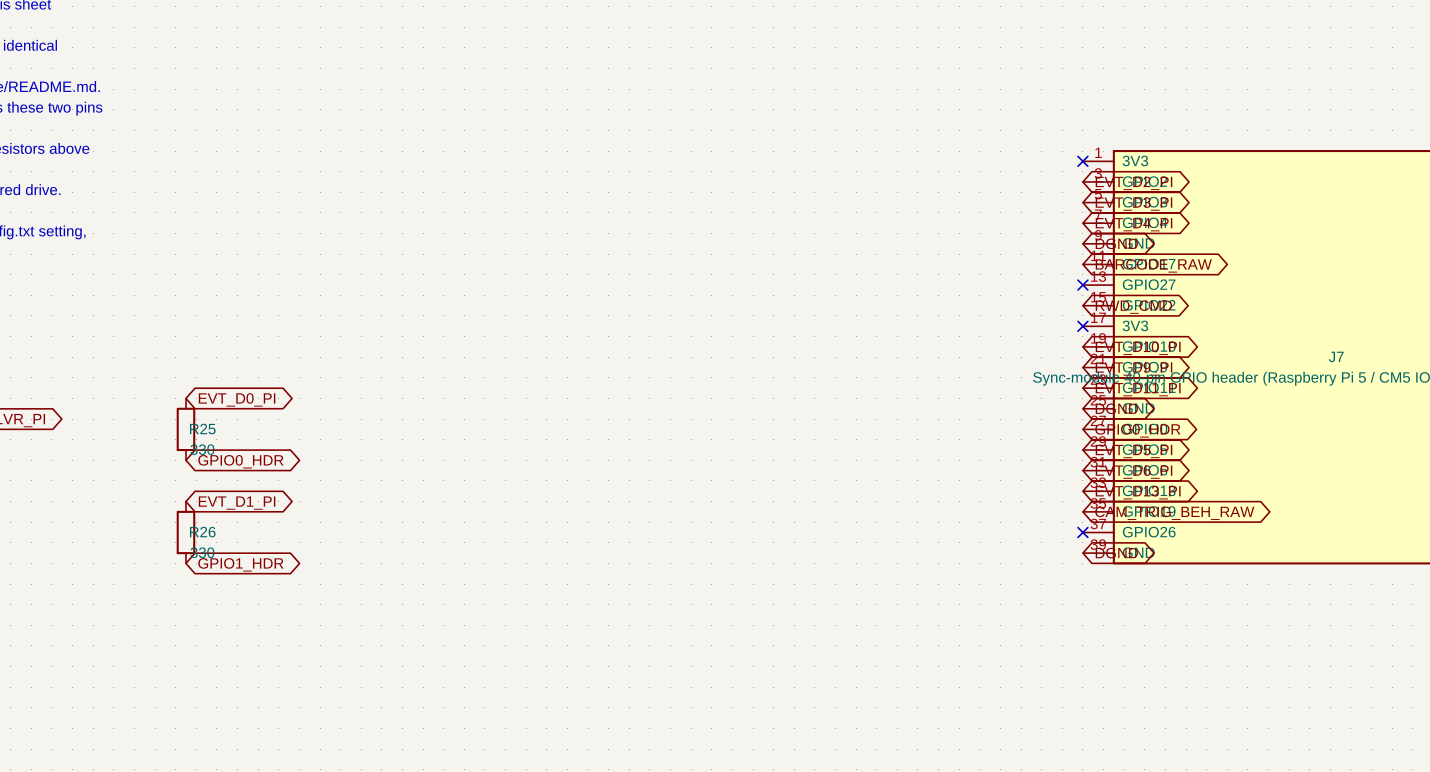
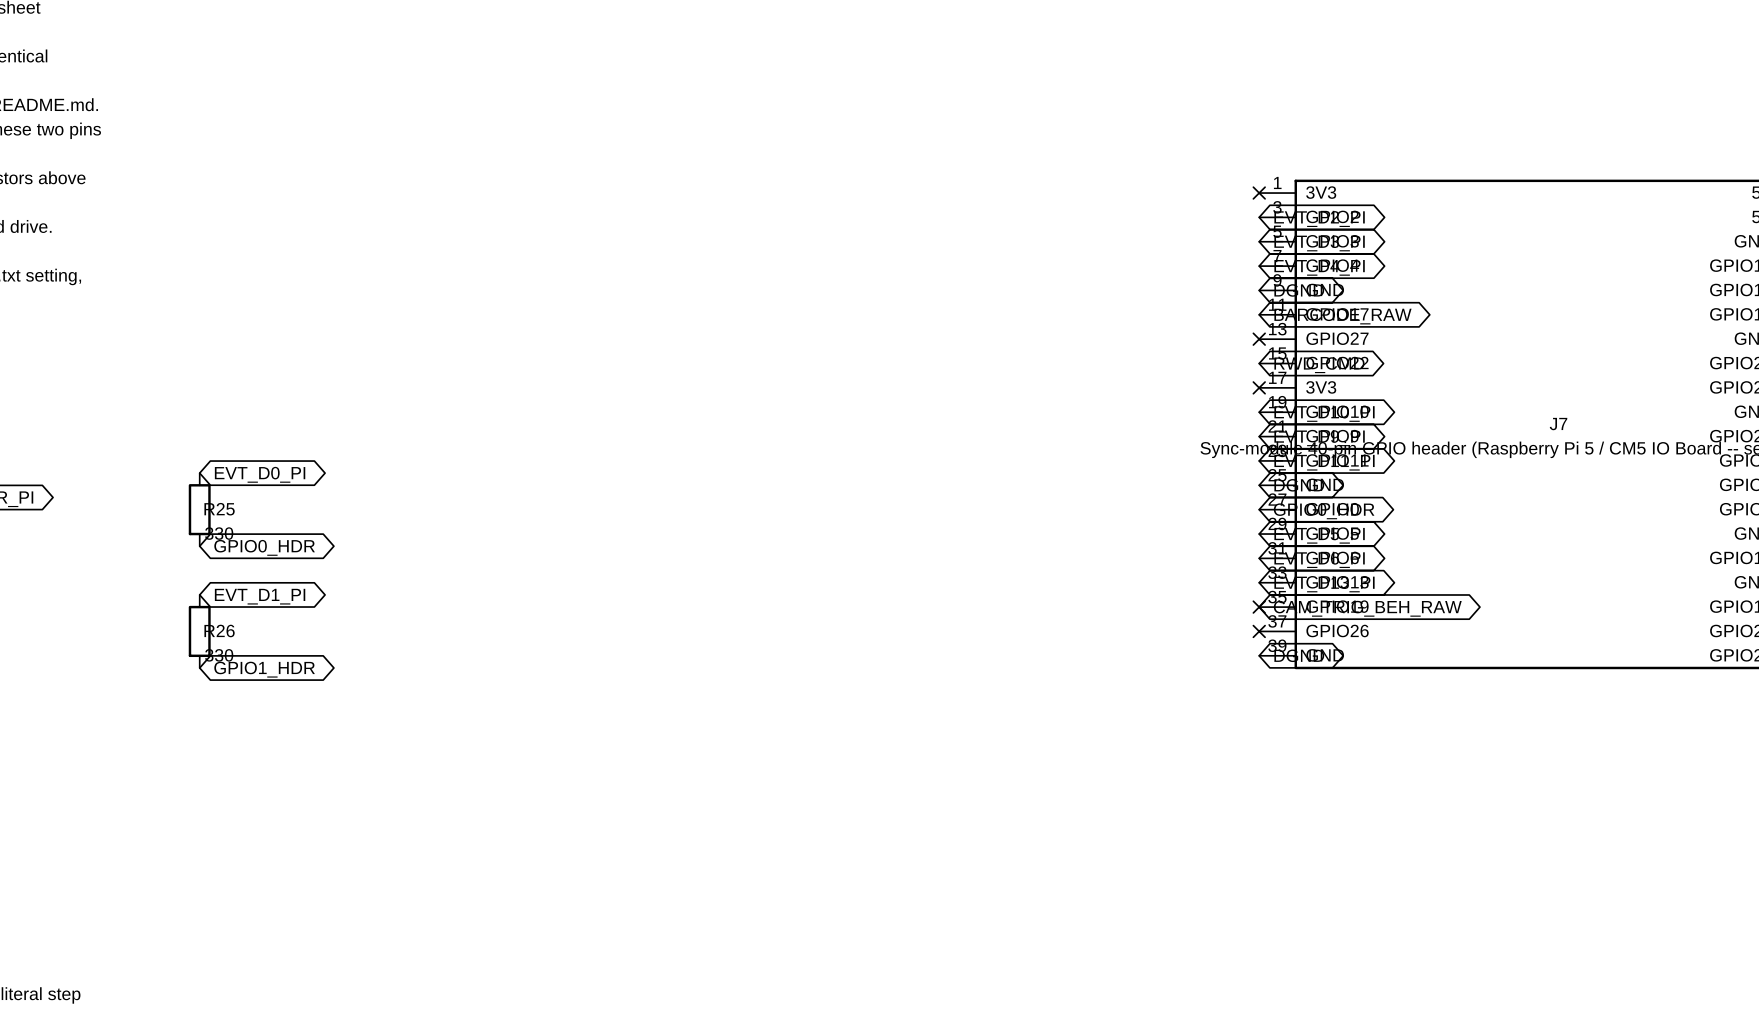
no-connect mark: none -> (1259, 607)

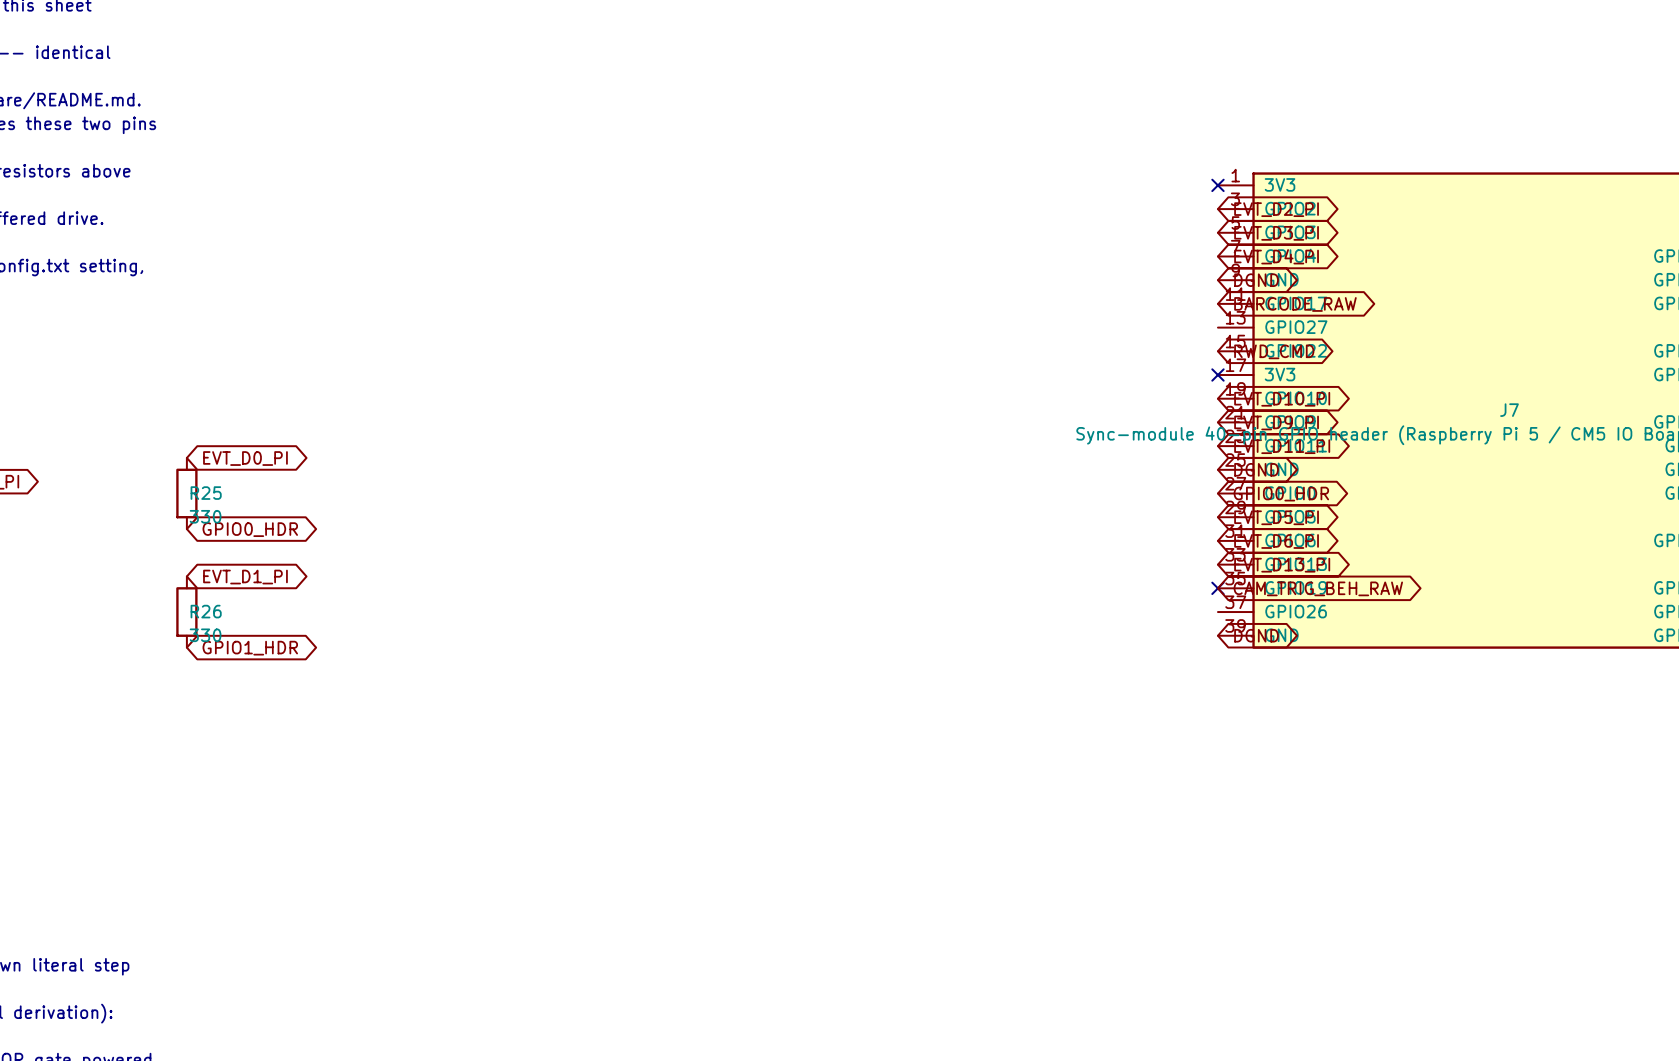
no-connect mark: (1259, 339) -> none
no-connect mark: (1259, 631) -> none

